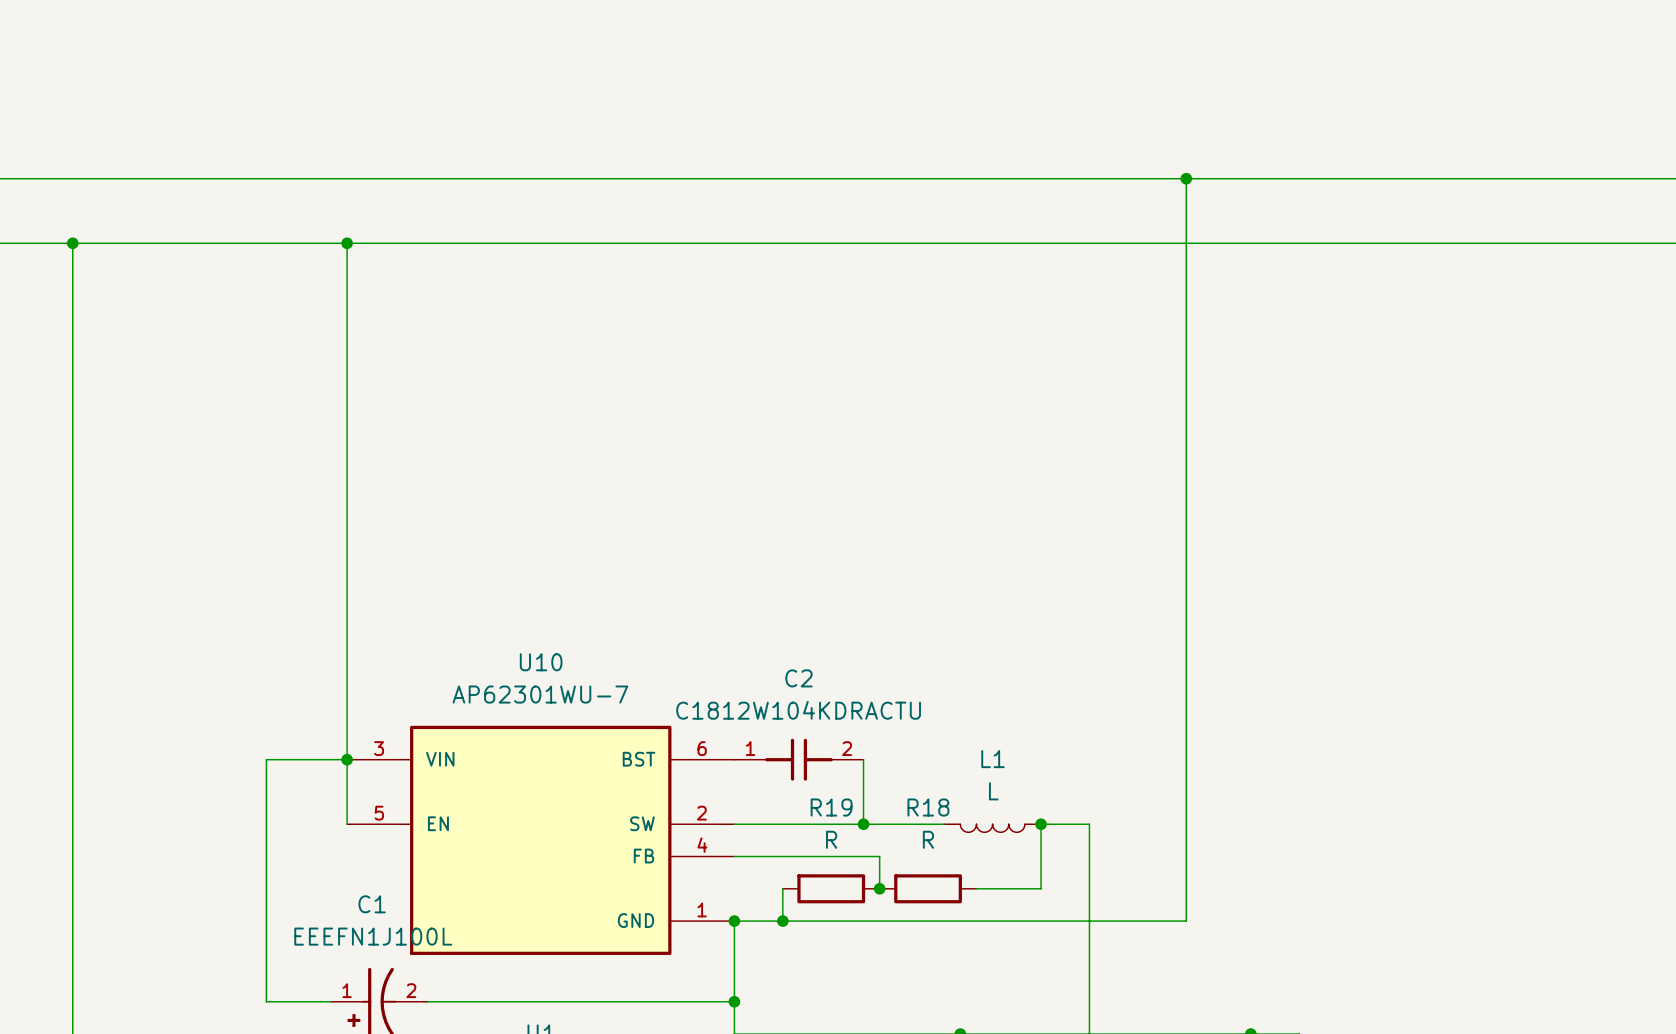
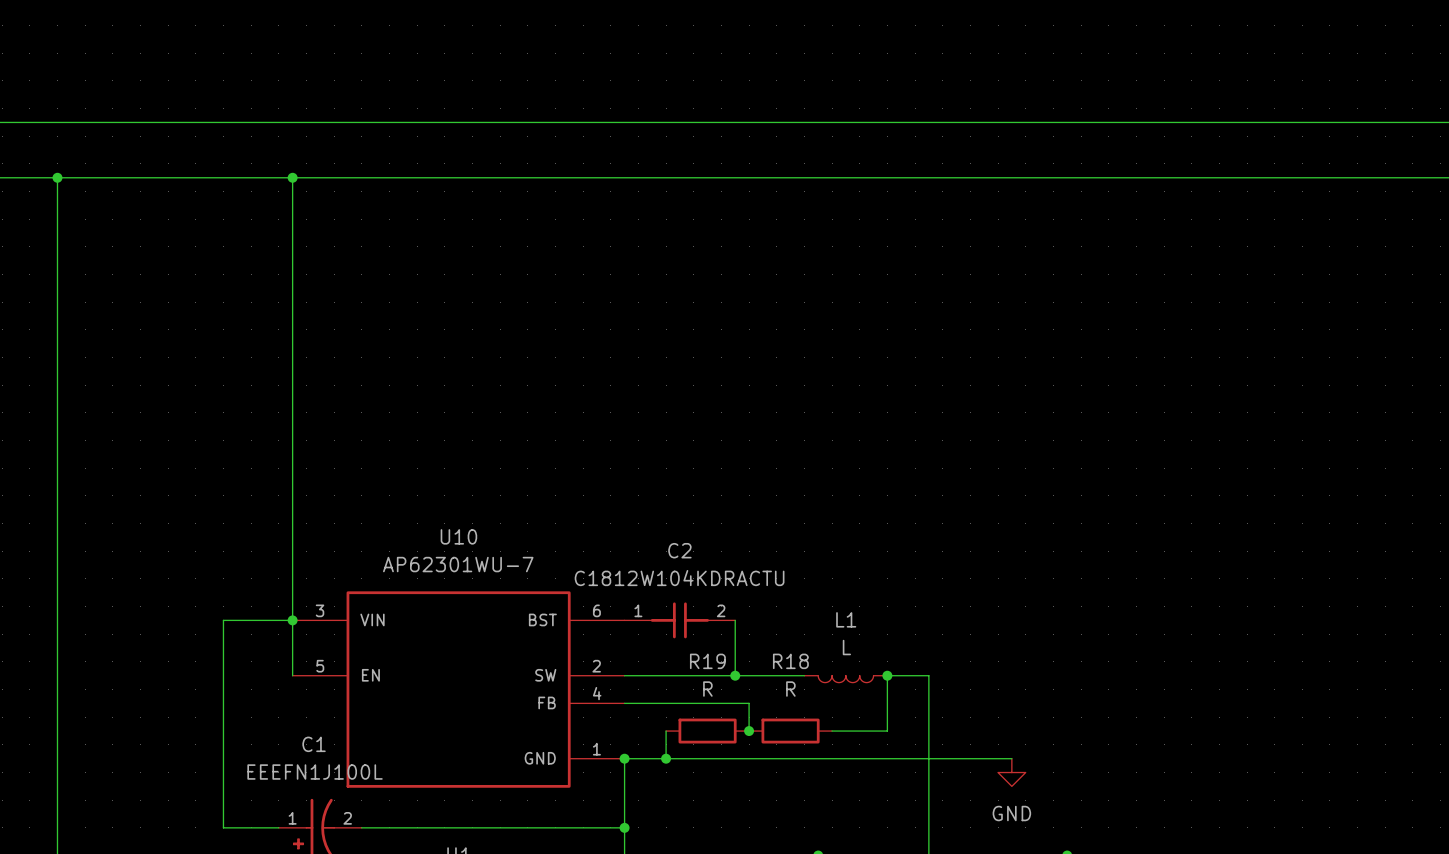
wire: (1186, 178) (1186, 921) -> none
junction: (1186, 178) -> none
power symbol: none -> GND (1011, 772)

